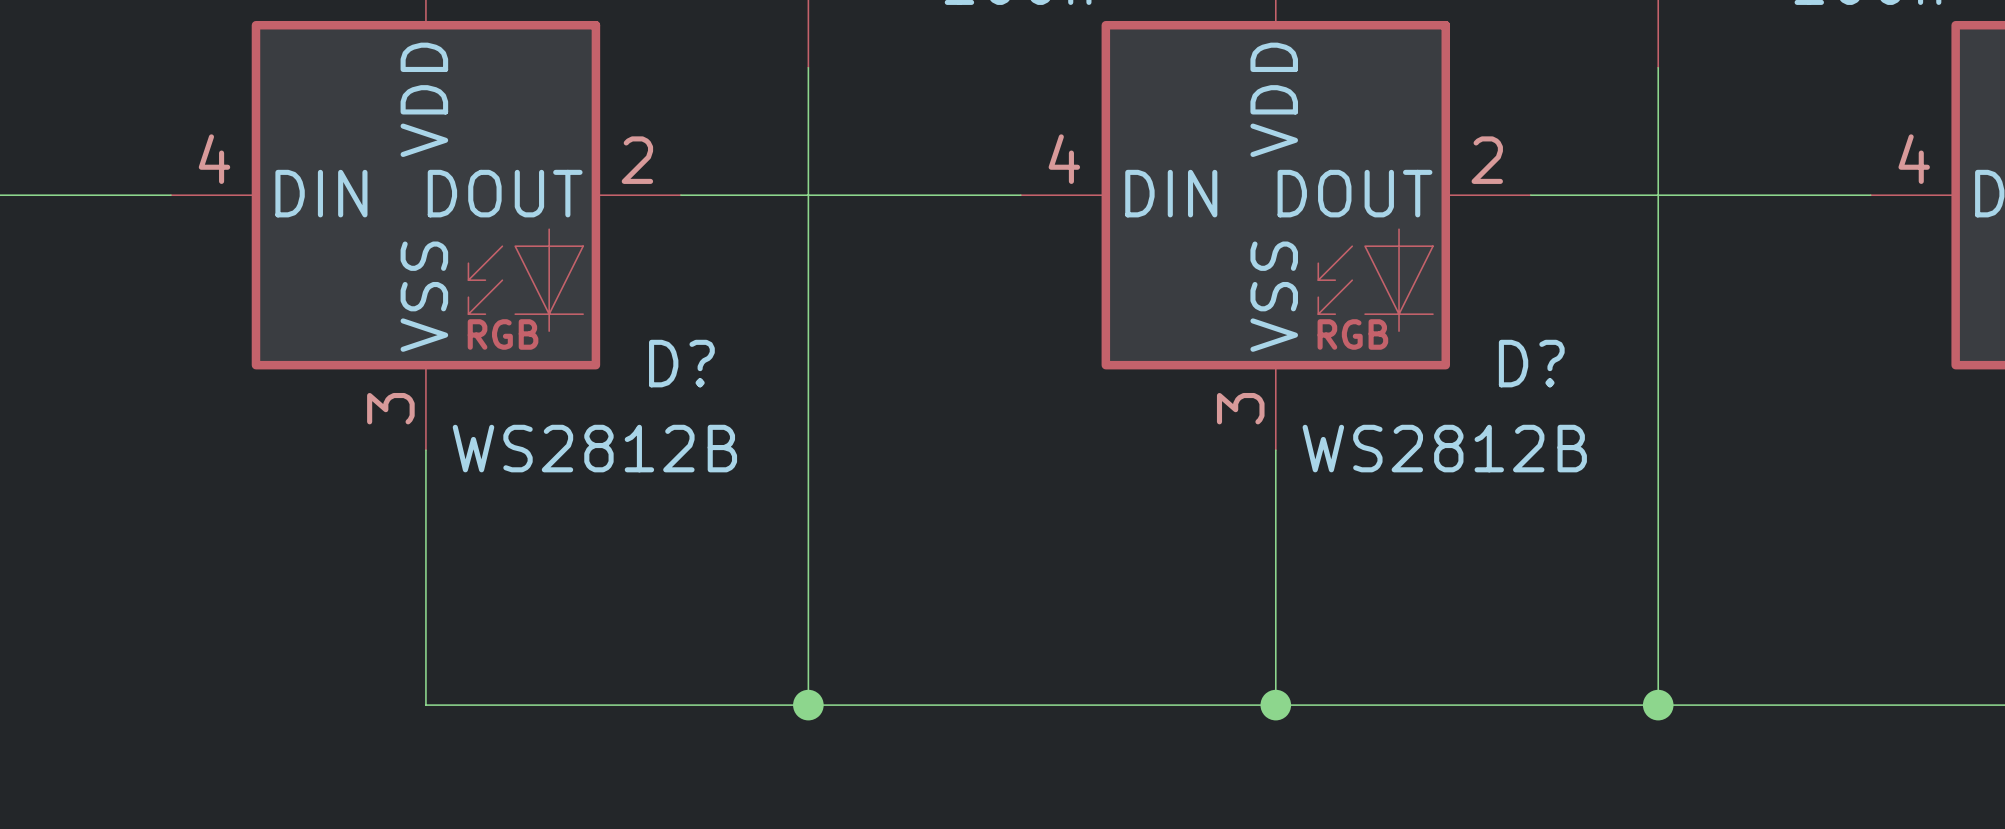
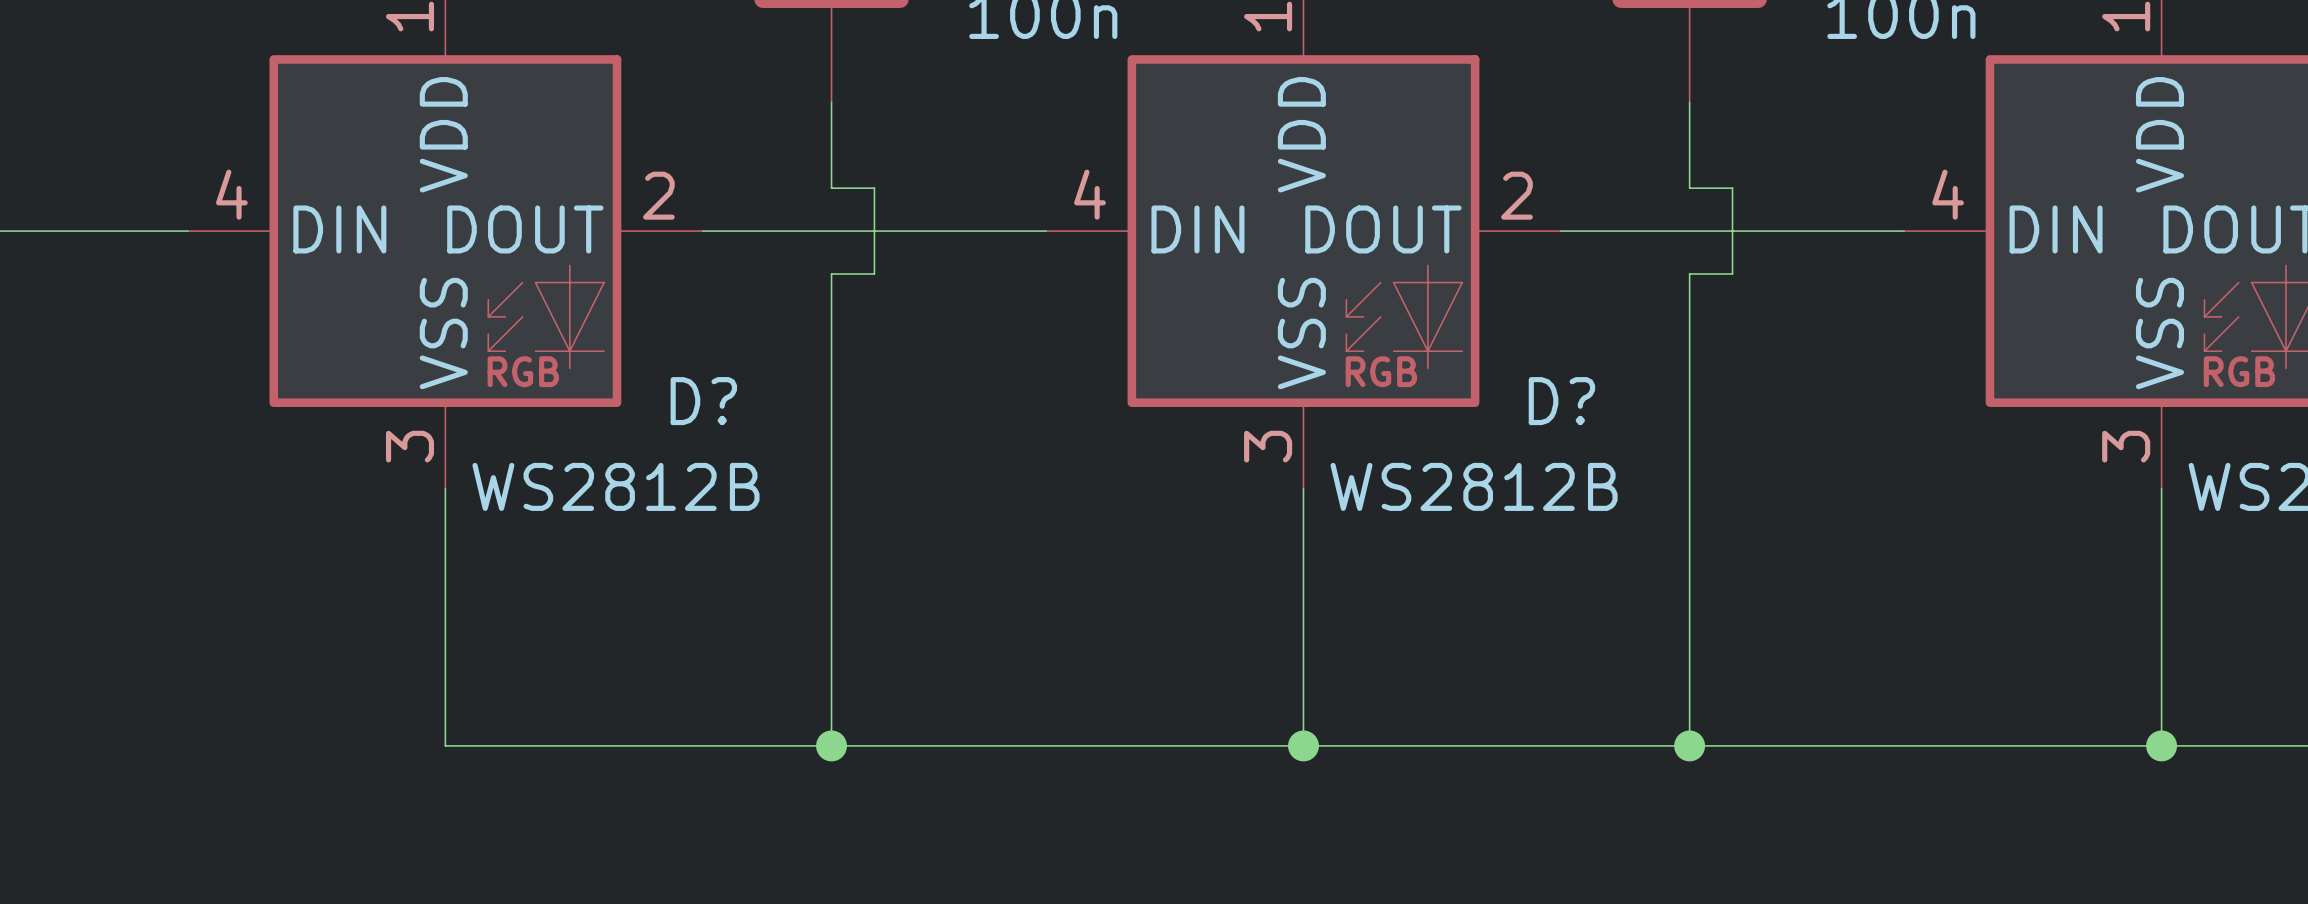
wire: (808, 152) (808, 237) -> (831, 188) (874, 188) (874, 273) (831, 273)
wire: (1658, 152) (1658, 237) -> (1689, 188) (1732, 188) (1732, 273) (1689, 273)

